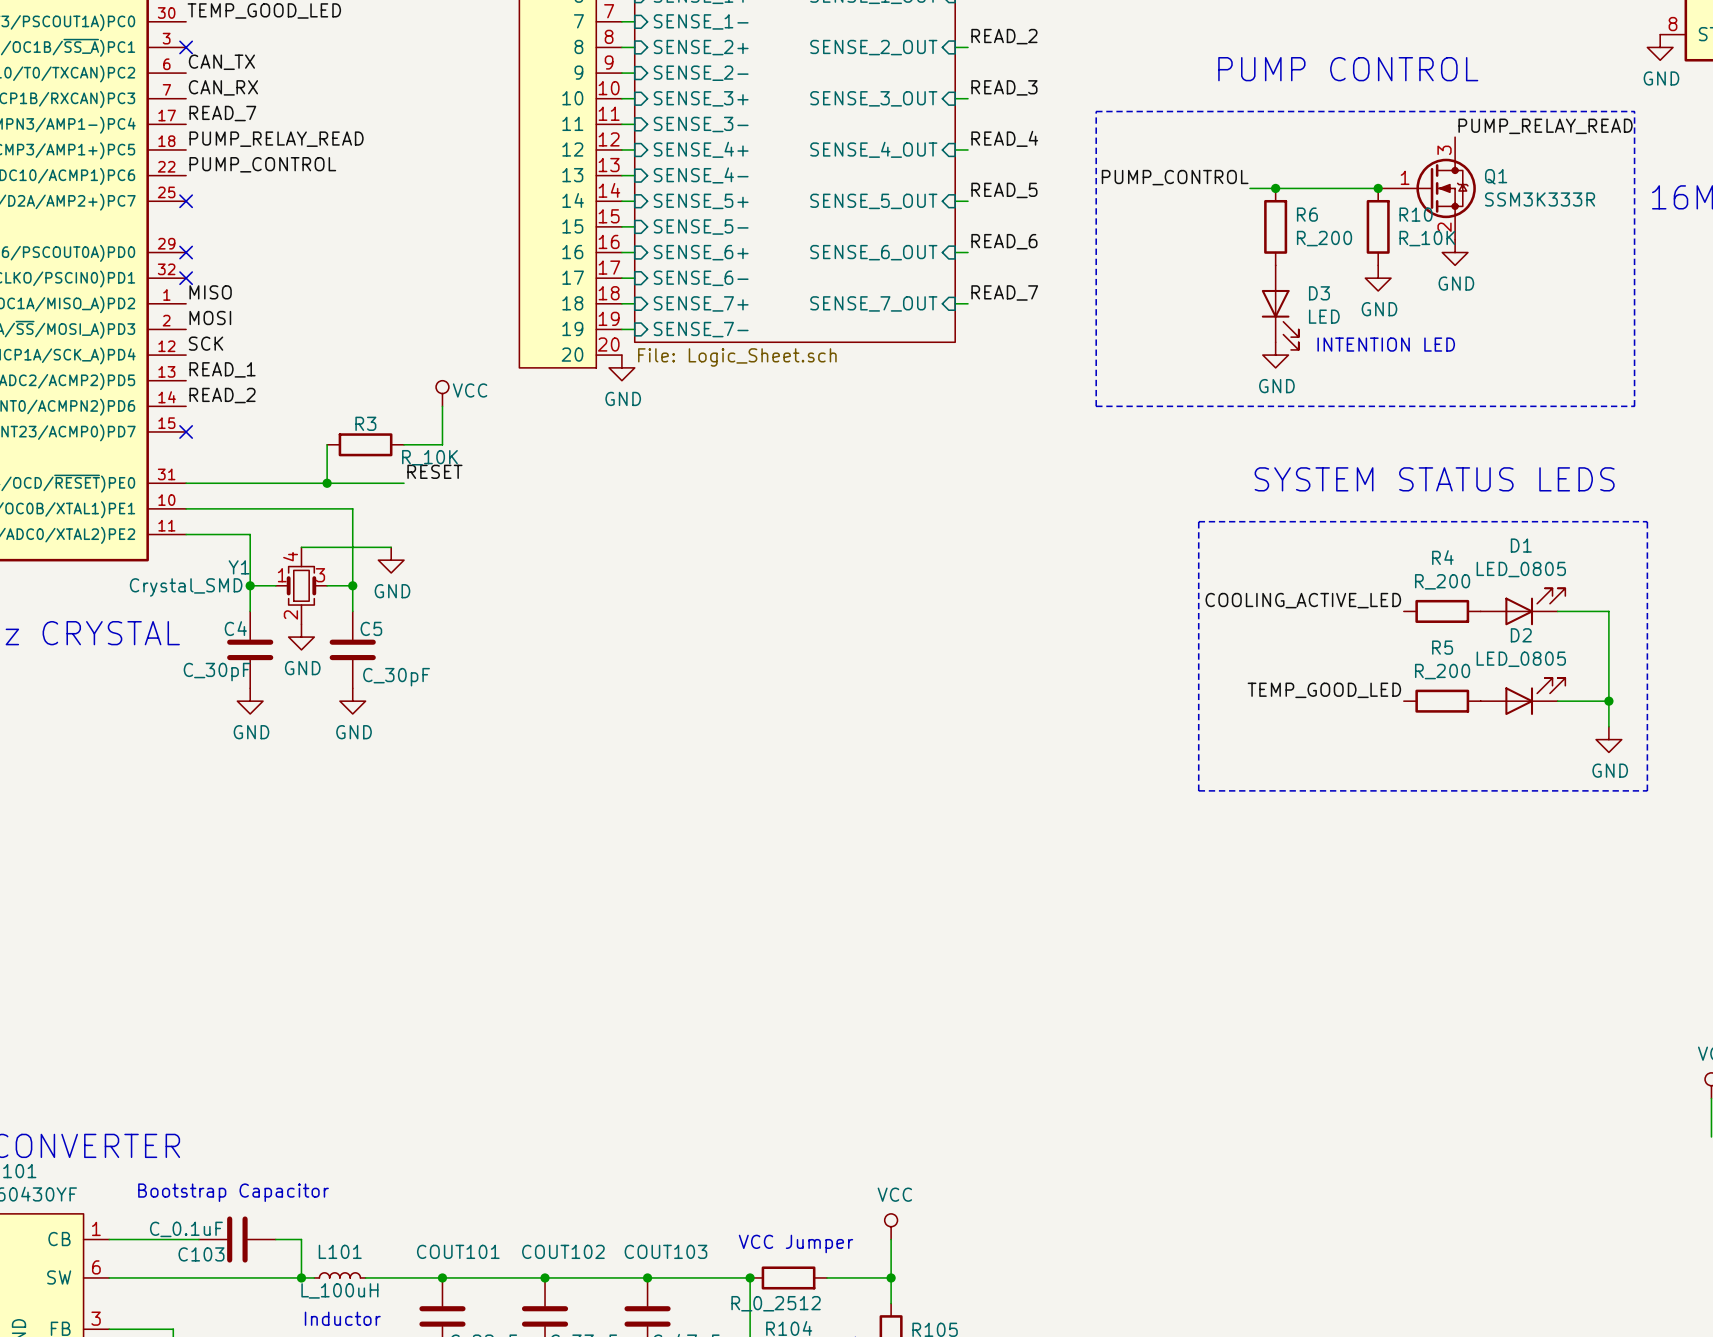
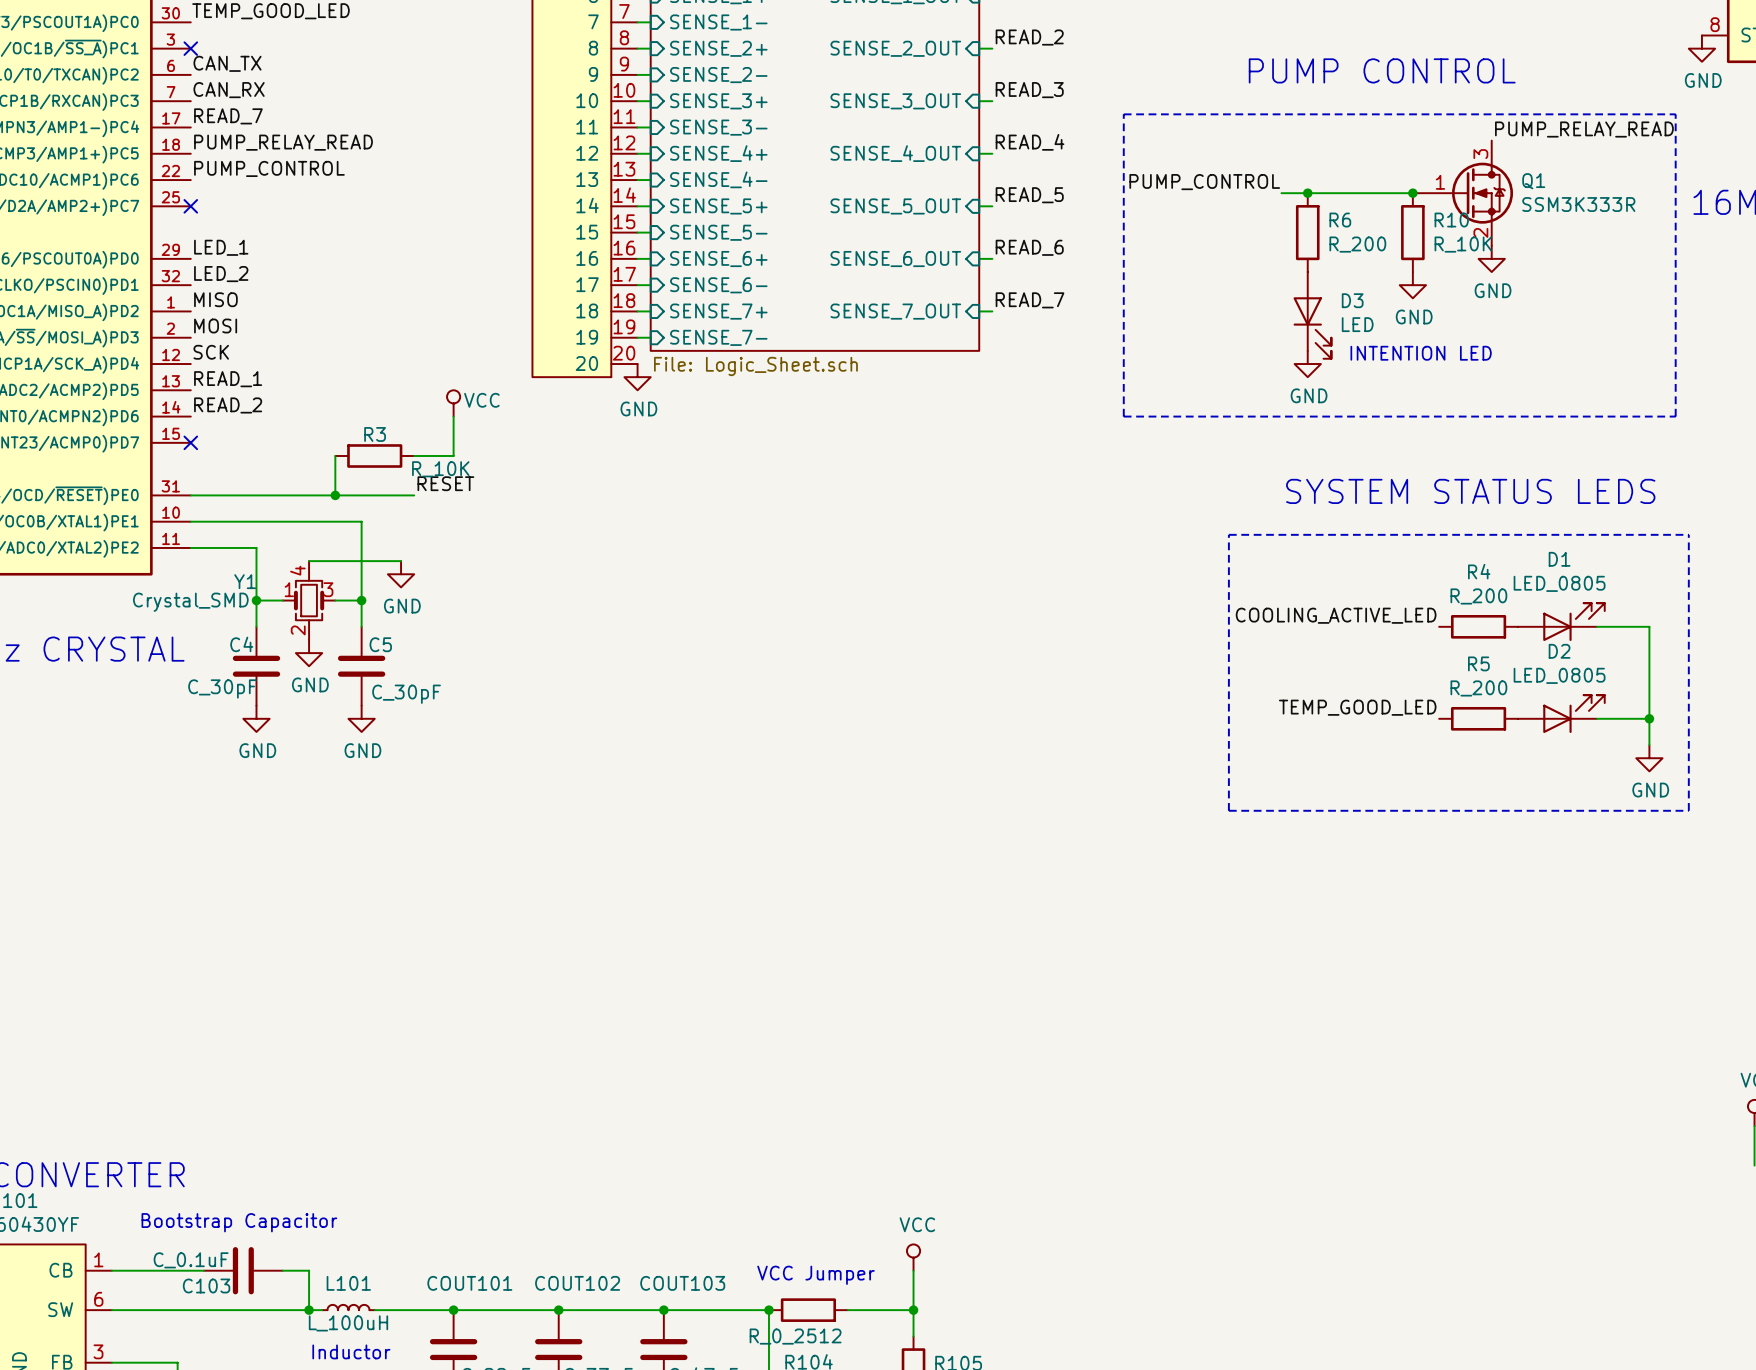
label: none -> LED_1 (221, 247)
no-connect mark: (186, 252) -> none
label: none -> LED_2 (221, 274)
no-connect mark: (186, 278) -> none

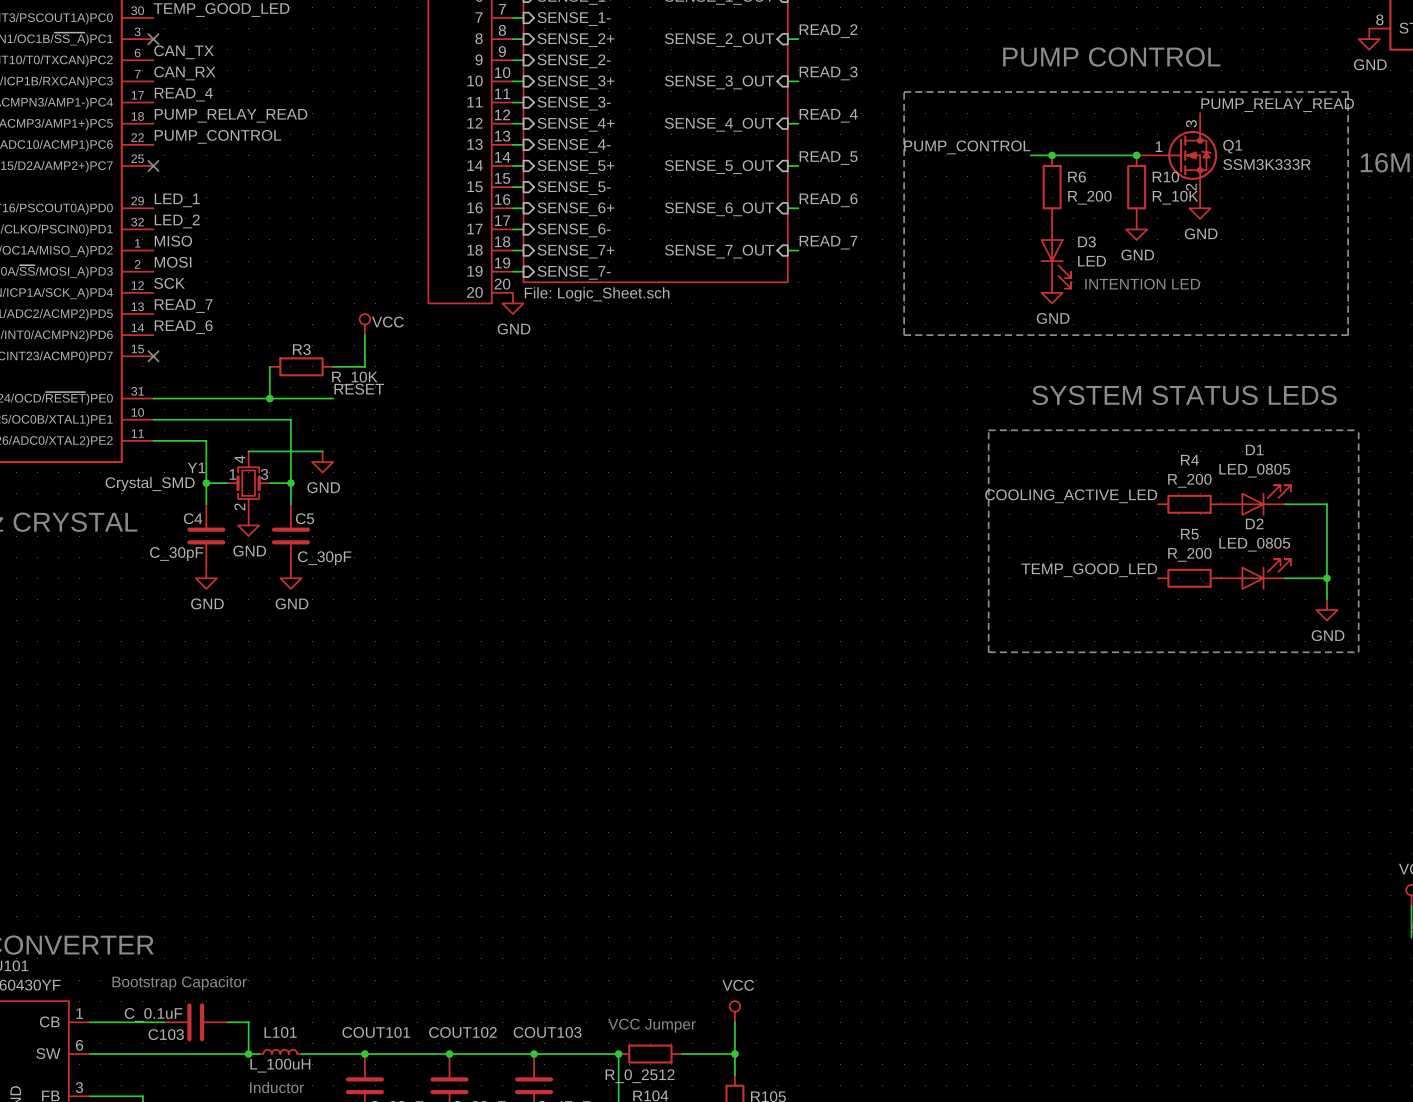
label: READ_7 (228, 116) -> READ_4 (183, 94)
label: READ_1 (228, 379) -> READ_7 (183, 306)
label: READ_2 (228, 405) -> READ_6 (183, 327)

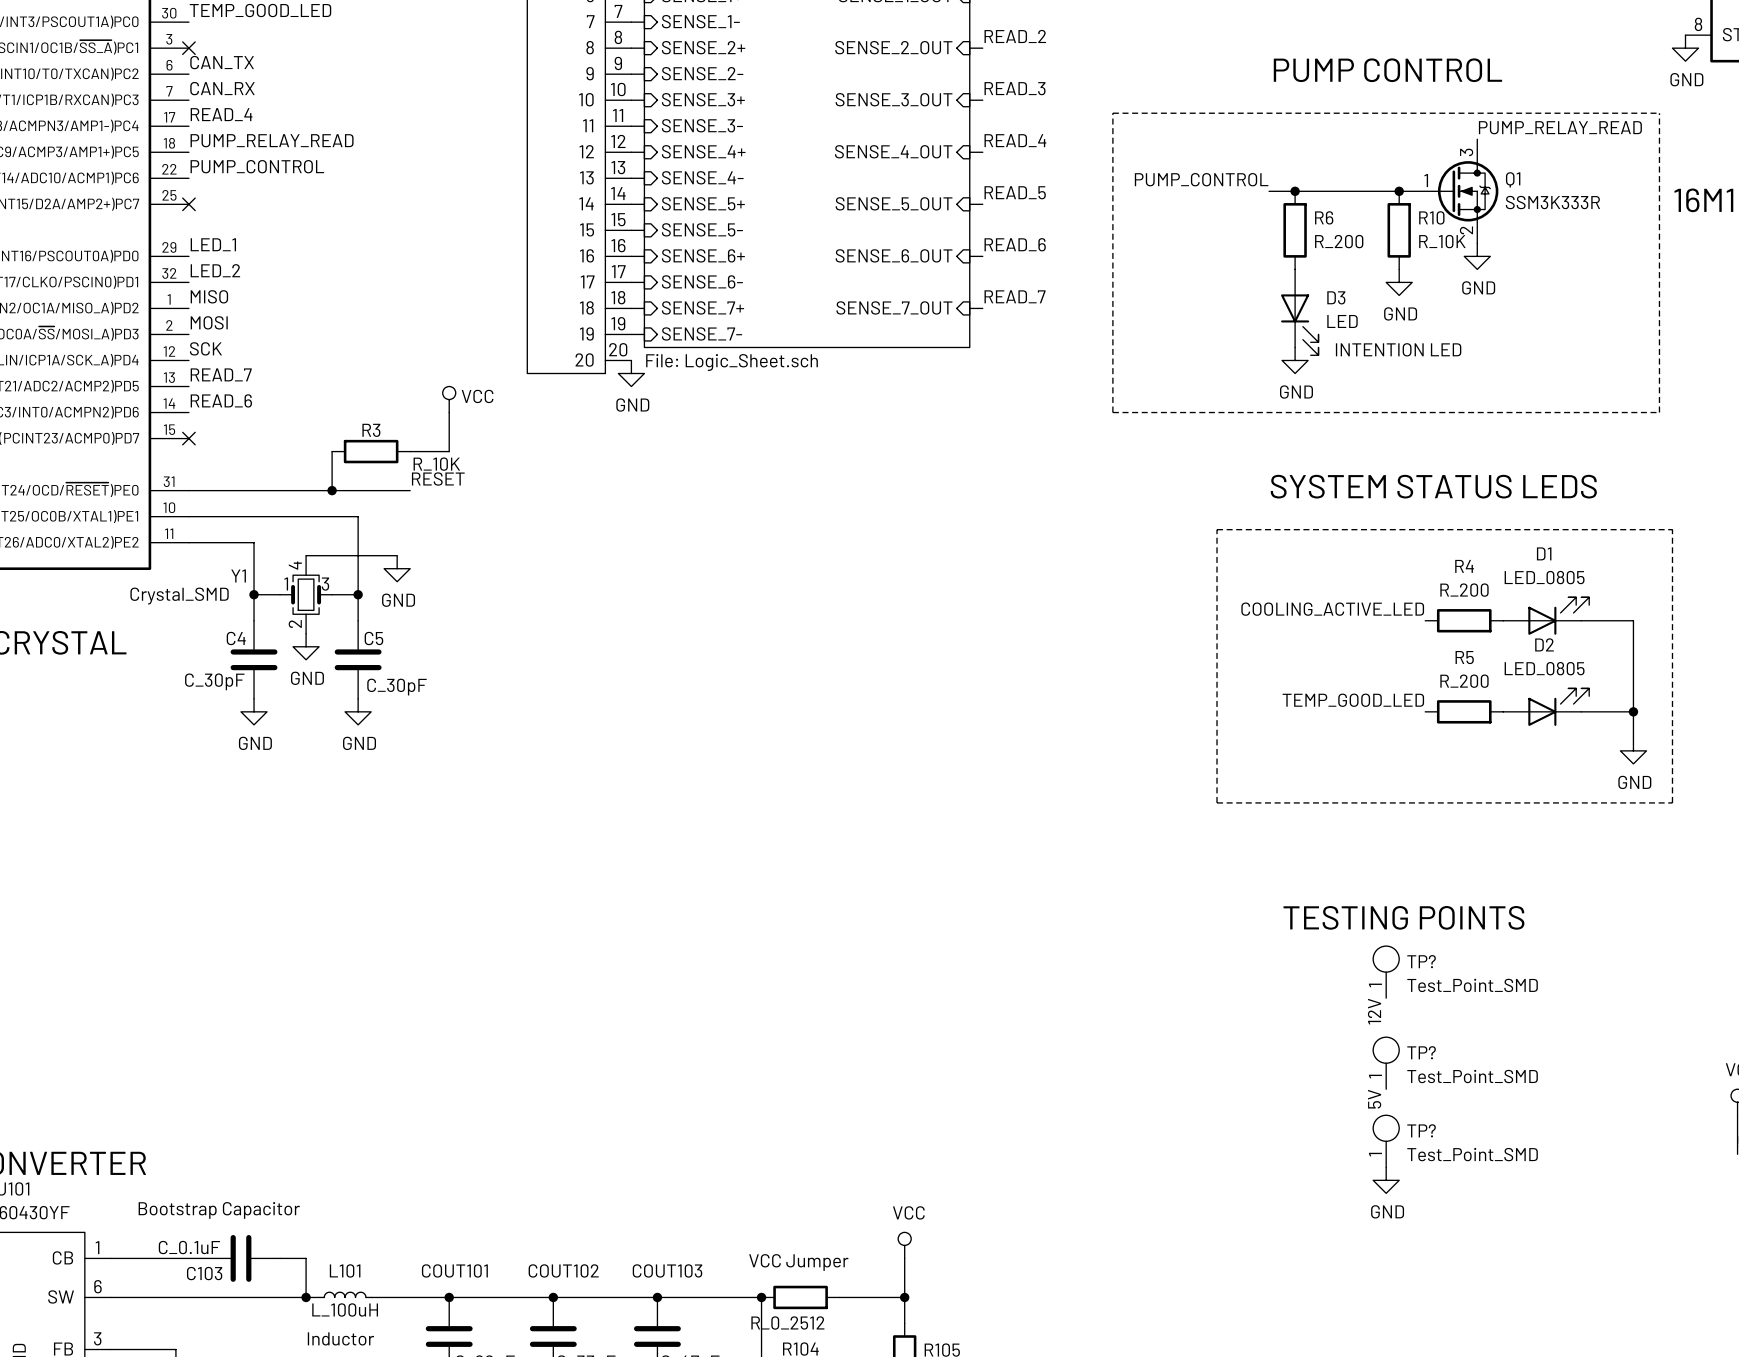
text: none -> TESTING POINTS (1403, 917)
TP?: none -> Test_Point_SMD (1386, 972)
label: none -> 12V (1374, 1011)
TP?: none -> Test_Point_SMD (1386, 1063)
label: none -> 5V (1374, 1099)
TP?: none -> Test_Point_SMD (1386, 1141)
power symbol: none -> GND (1386, 1180)

